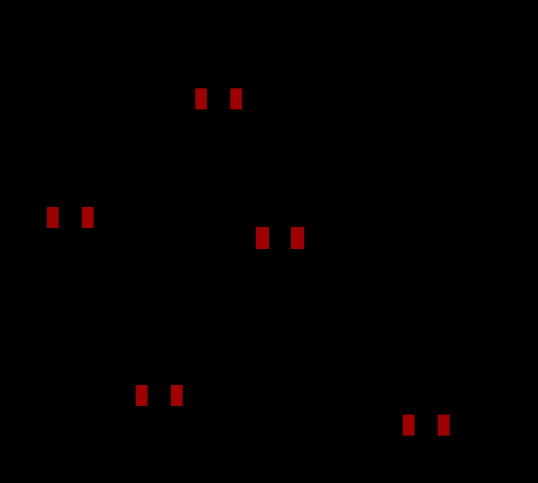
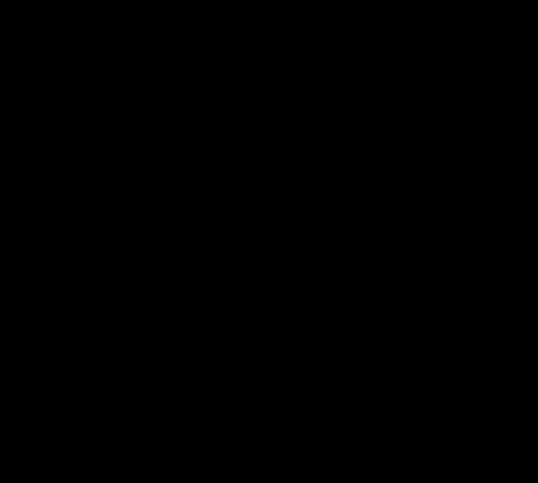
part: (218, 98) -> none
part: (70, 217) -> none
part: (279, 237) -> none
part: (159, 395) -> none
part: (426, 425) -> none

